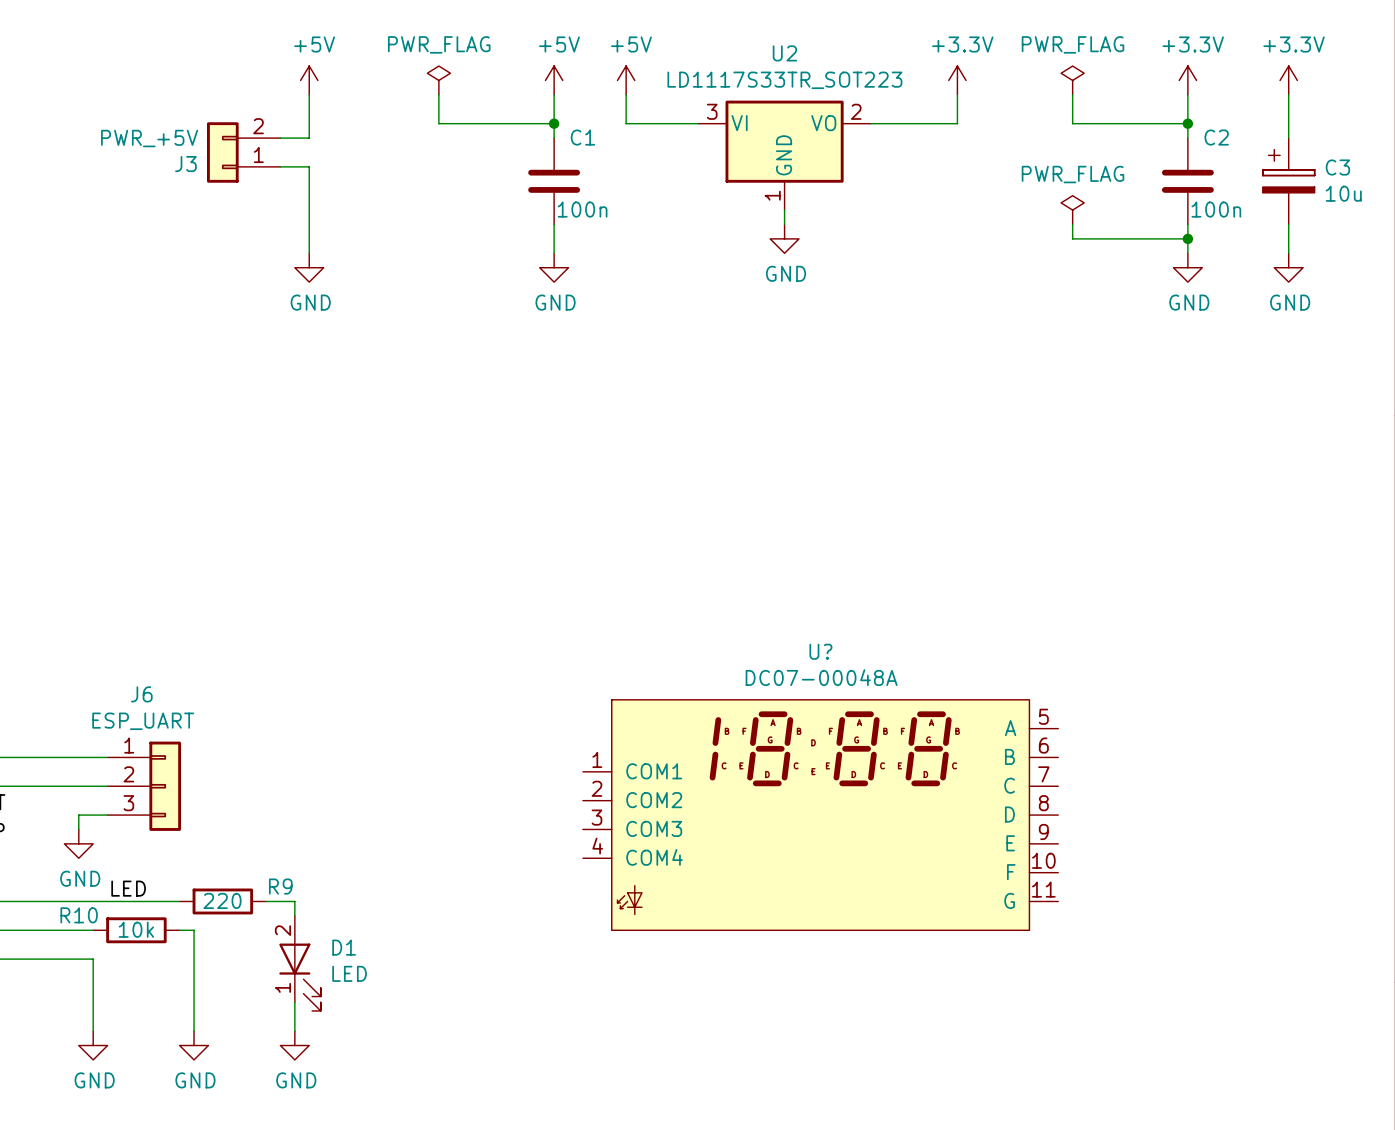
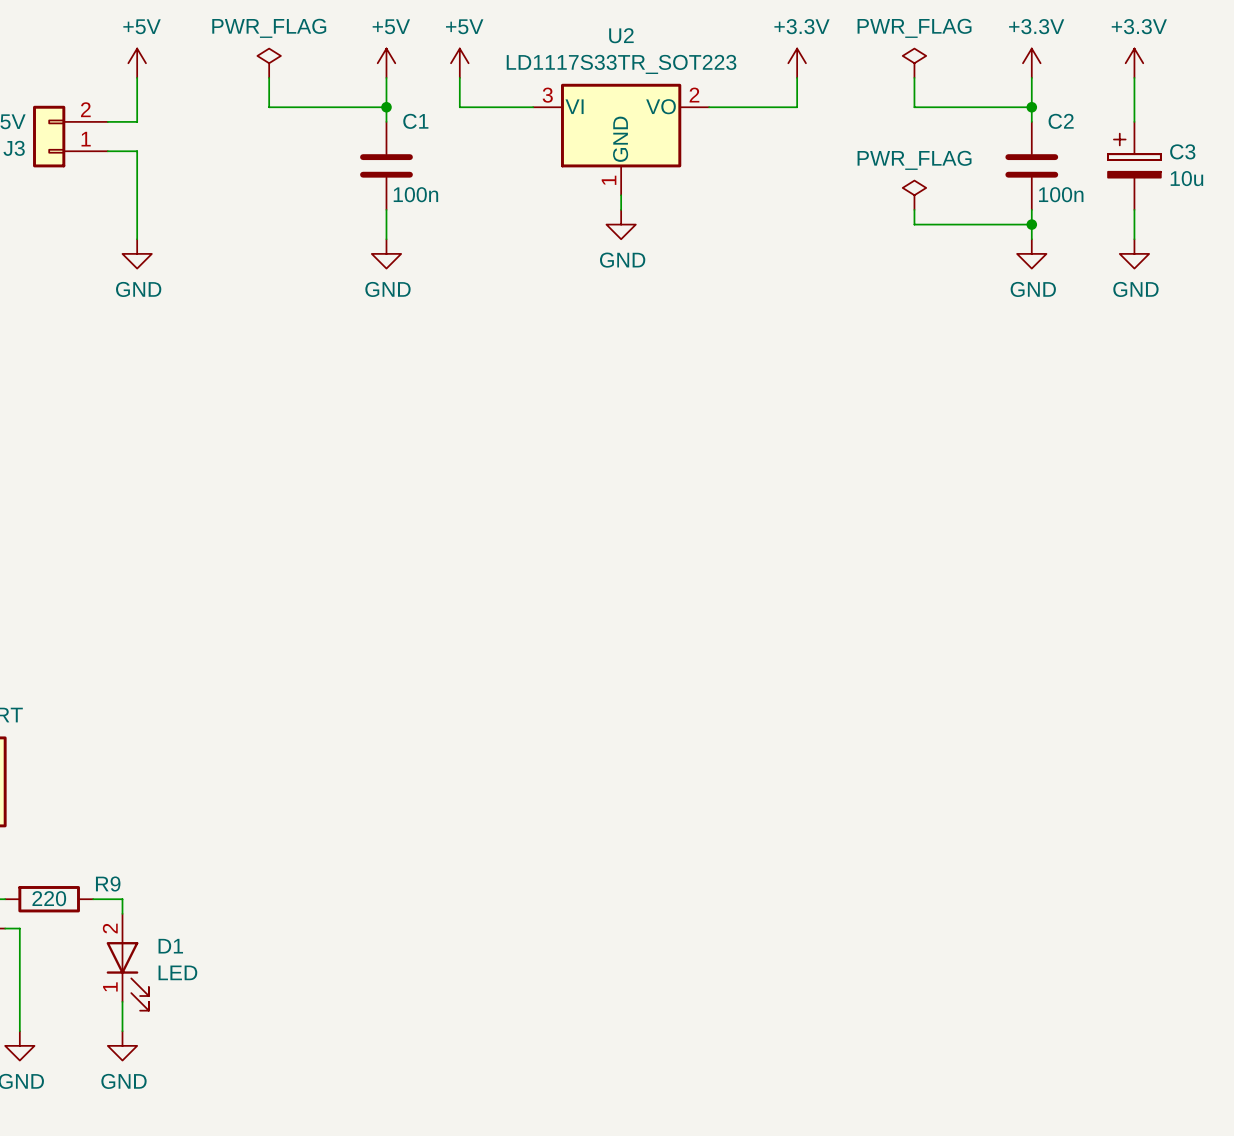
U?: DC07-00048A (820, 815) -> none

